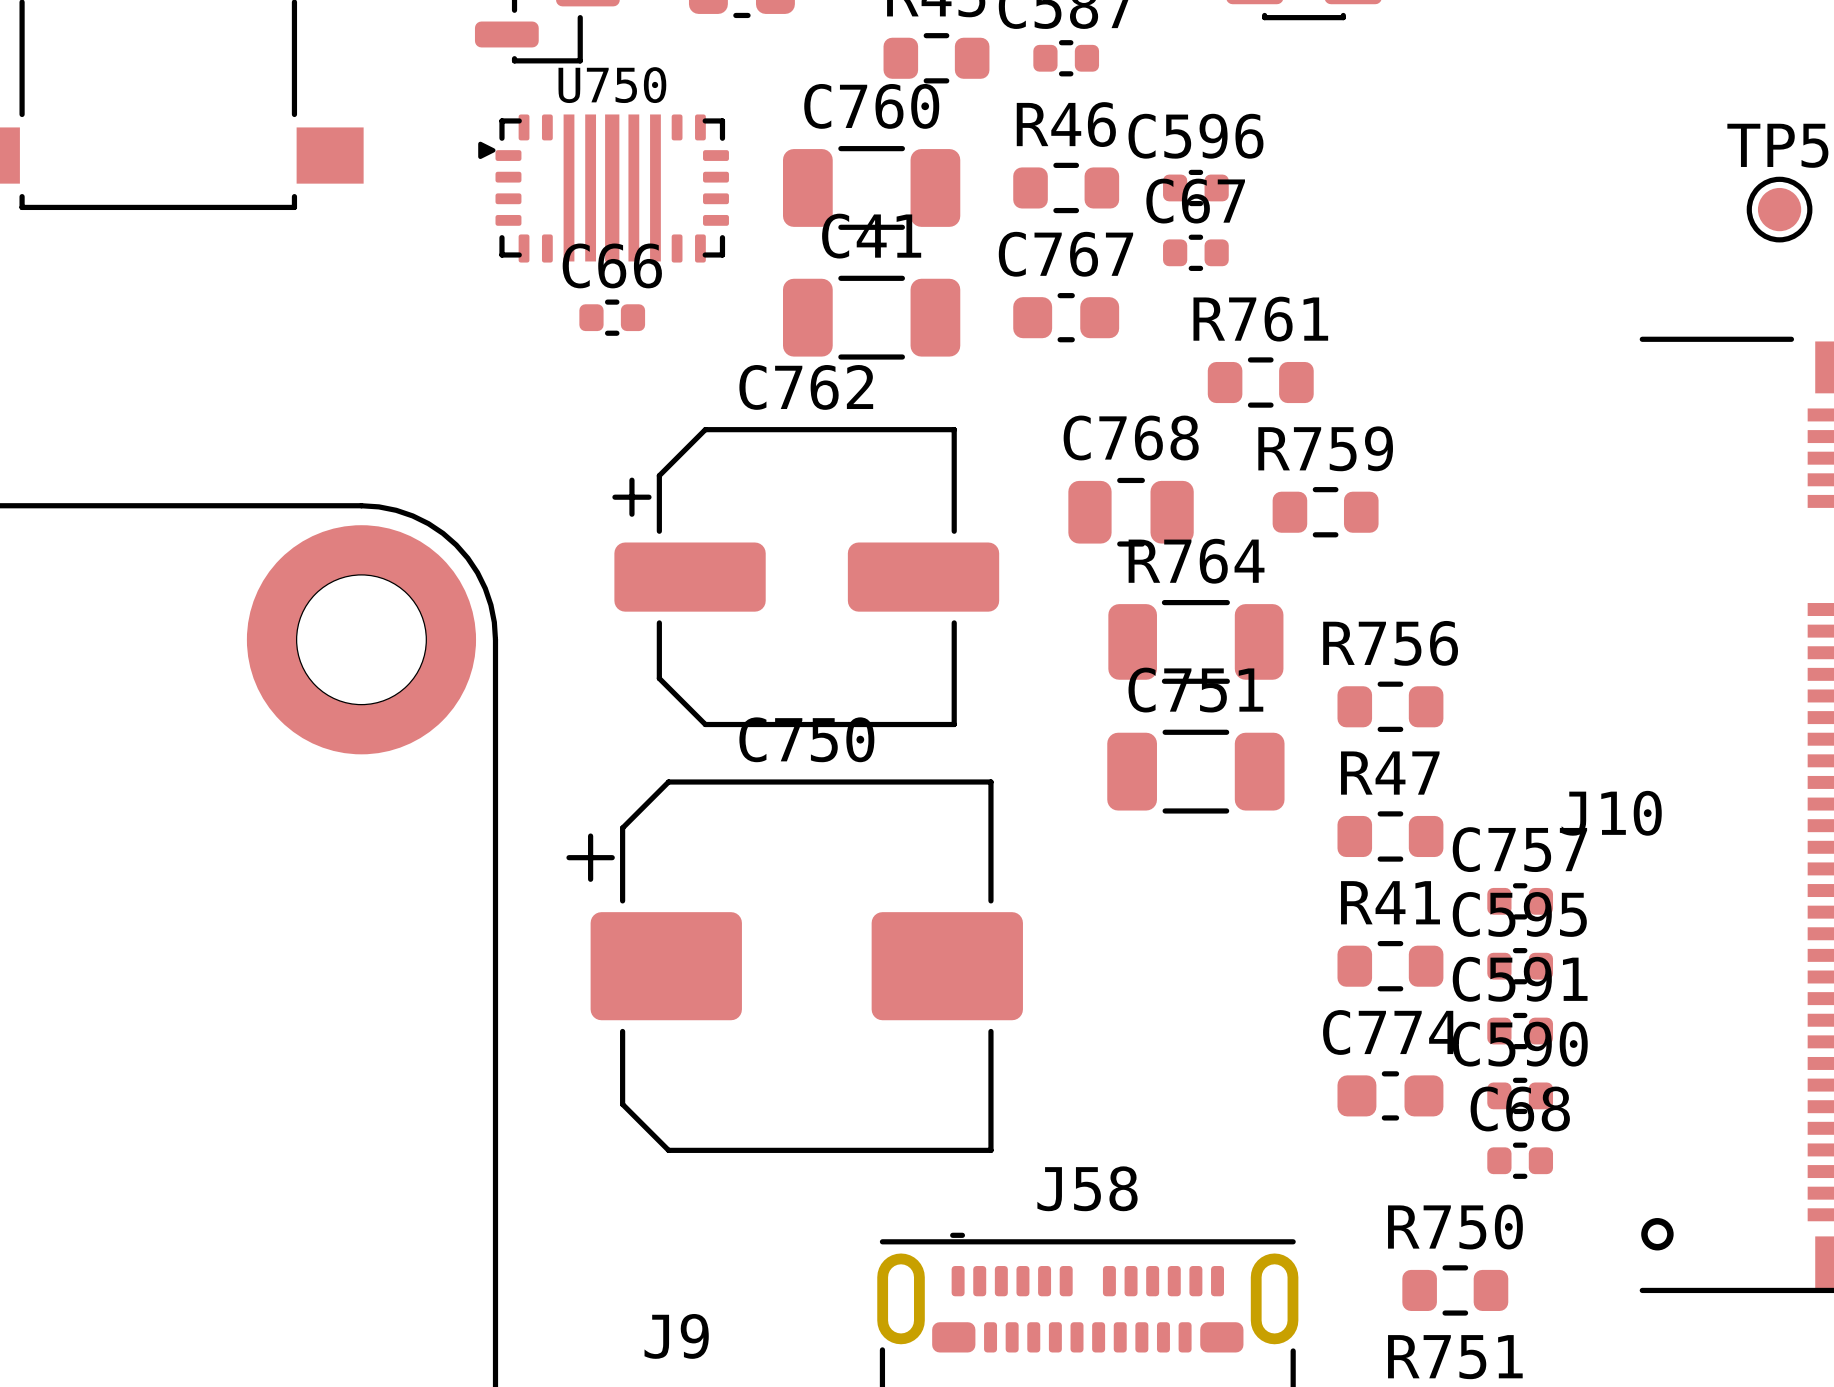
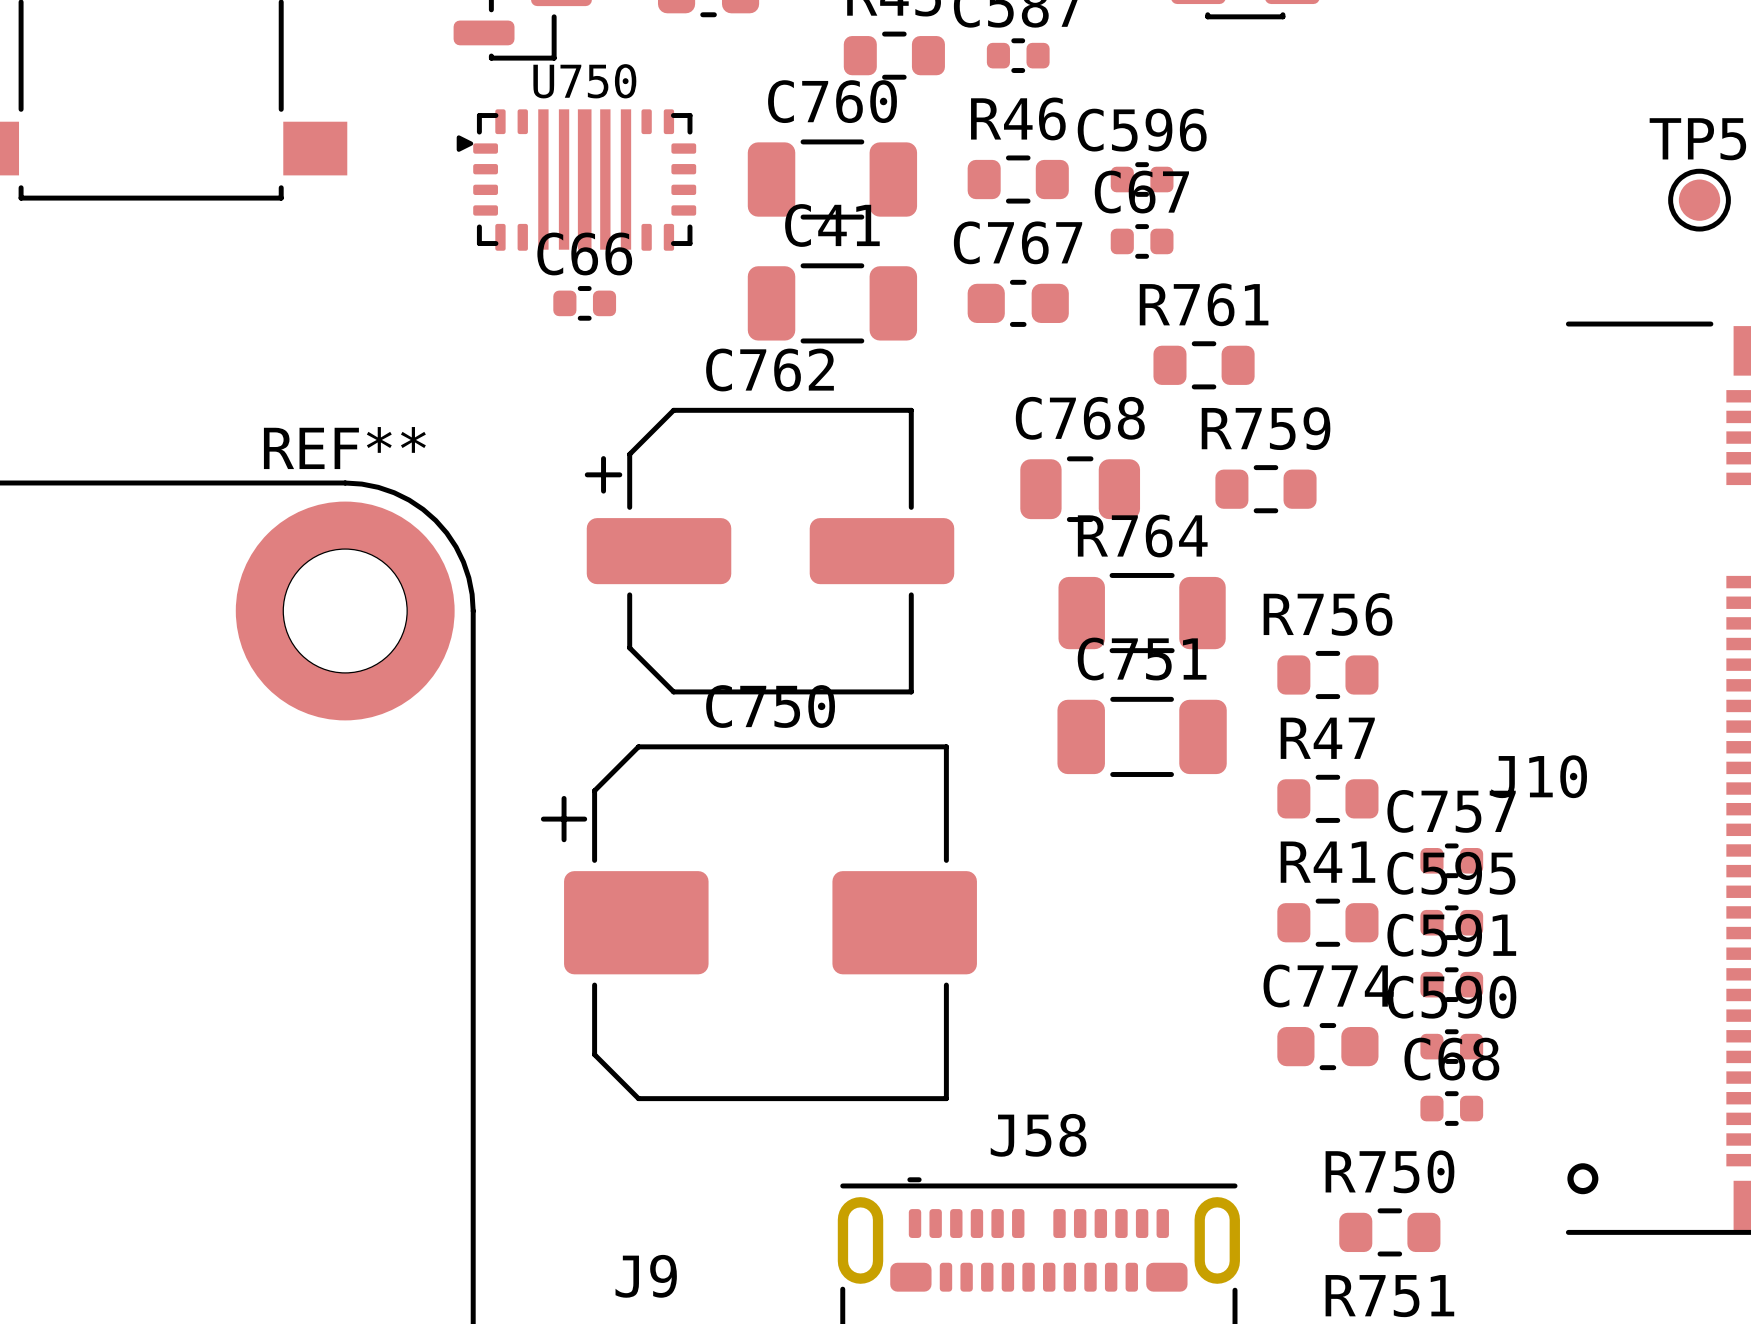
REF** name: none -> REF** (344, 448)

